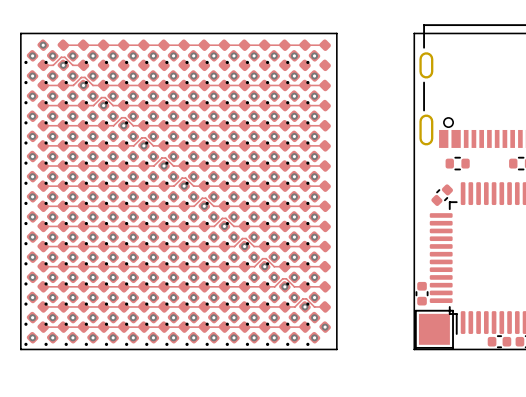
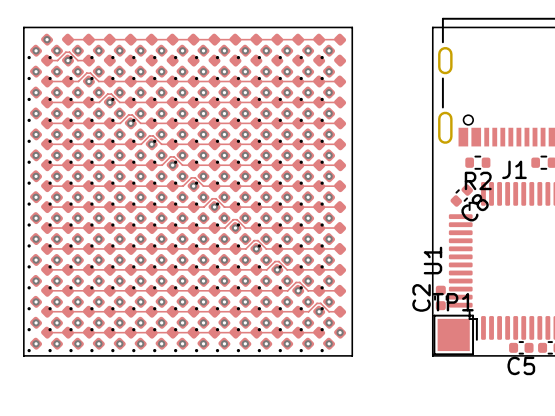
J1 name: none -> J1 (514, 169)
R2 name: none -> R2 (478, 180)
C8 name: none -> C8 (475, 207)
U1 name: none -> U1 (432, 260)
C2 name: none -> C2 (421, 297)
TP1 name: none -> TP1 (452, 302)
C5 name: none -> C5 (521, 365)

